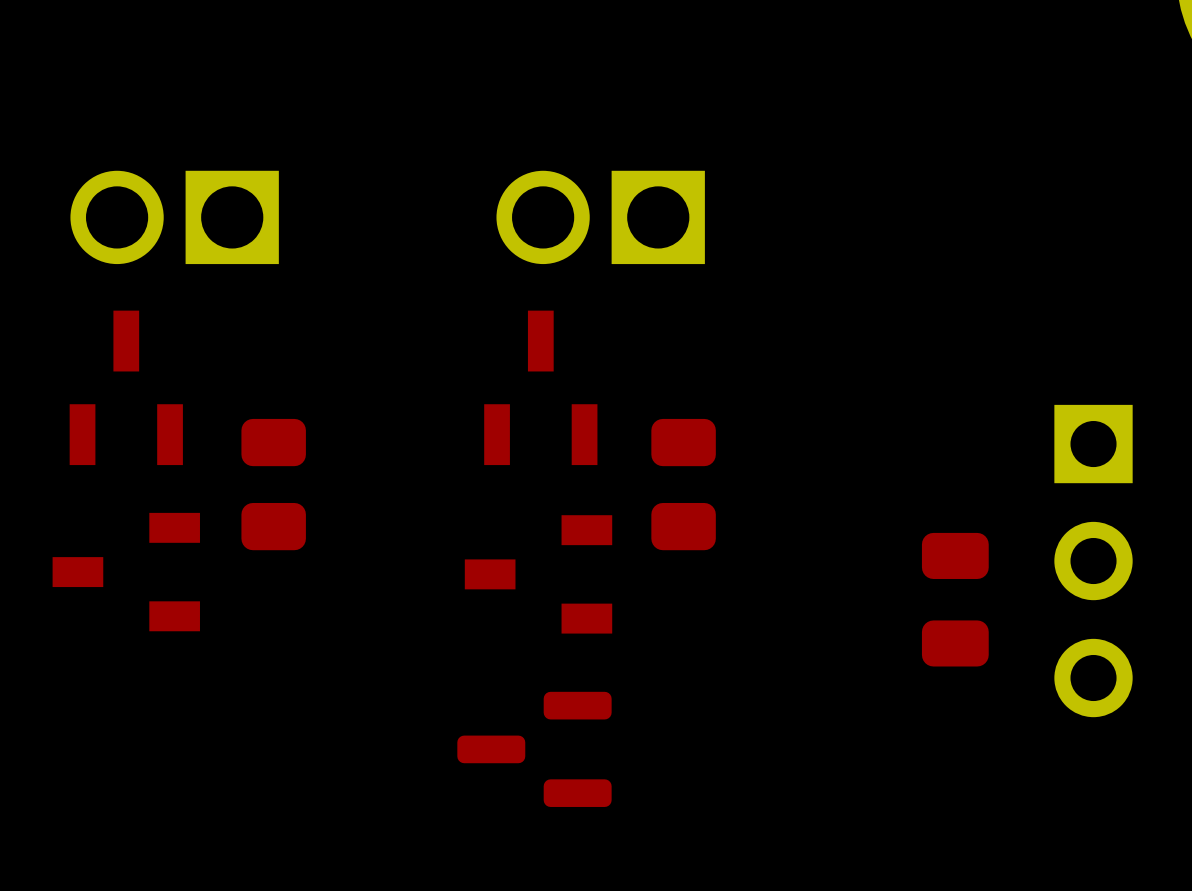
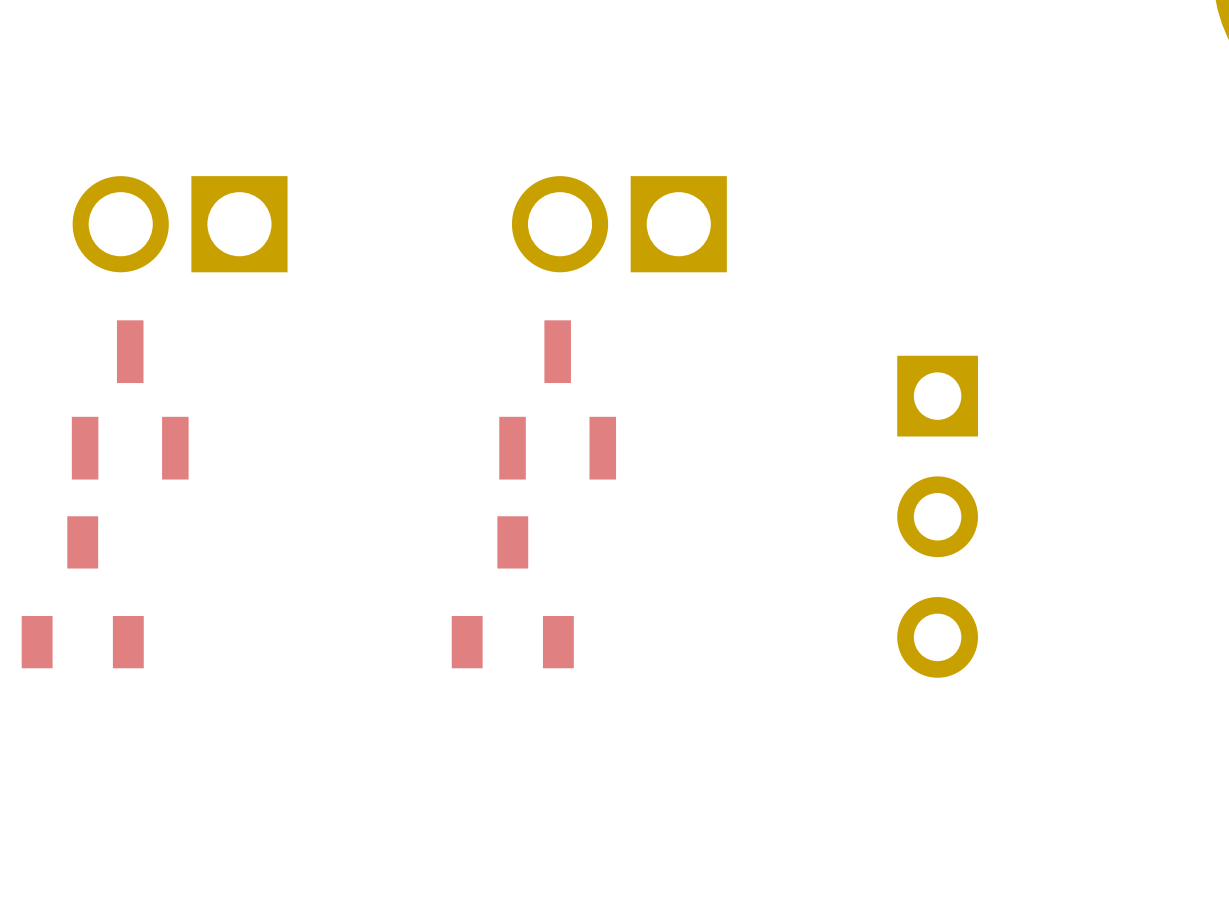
part: (273, 484) -> none
part: (683, 484) -> none
part position: (1093, 561) -> (937, 516)
part rotation: 0° (126, 572) -> 90° clockwise (82, 592)
part rotation: 0° (538, 574) -> 90° clockwise (512, 592)
part: (955, 599) -> none
part: (534, 749) -> none

